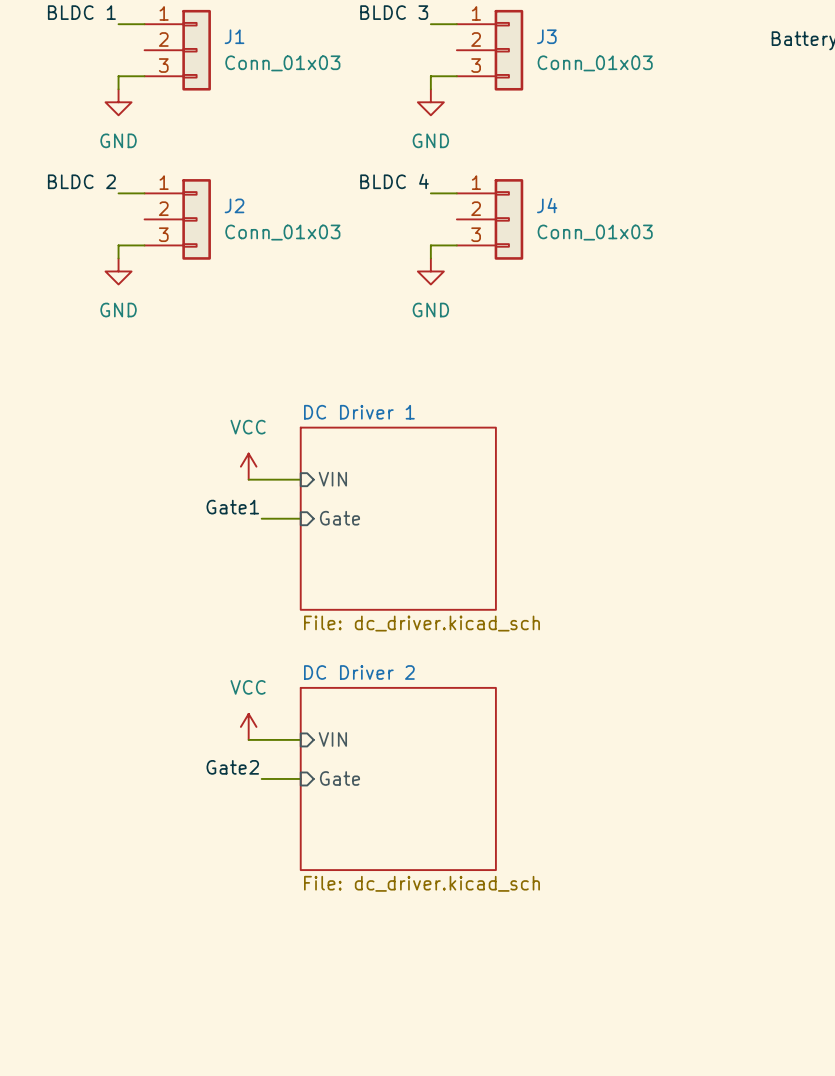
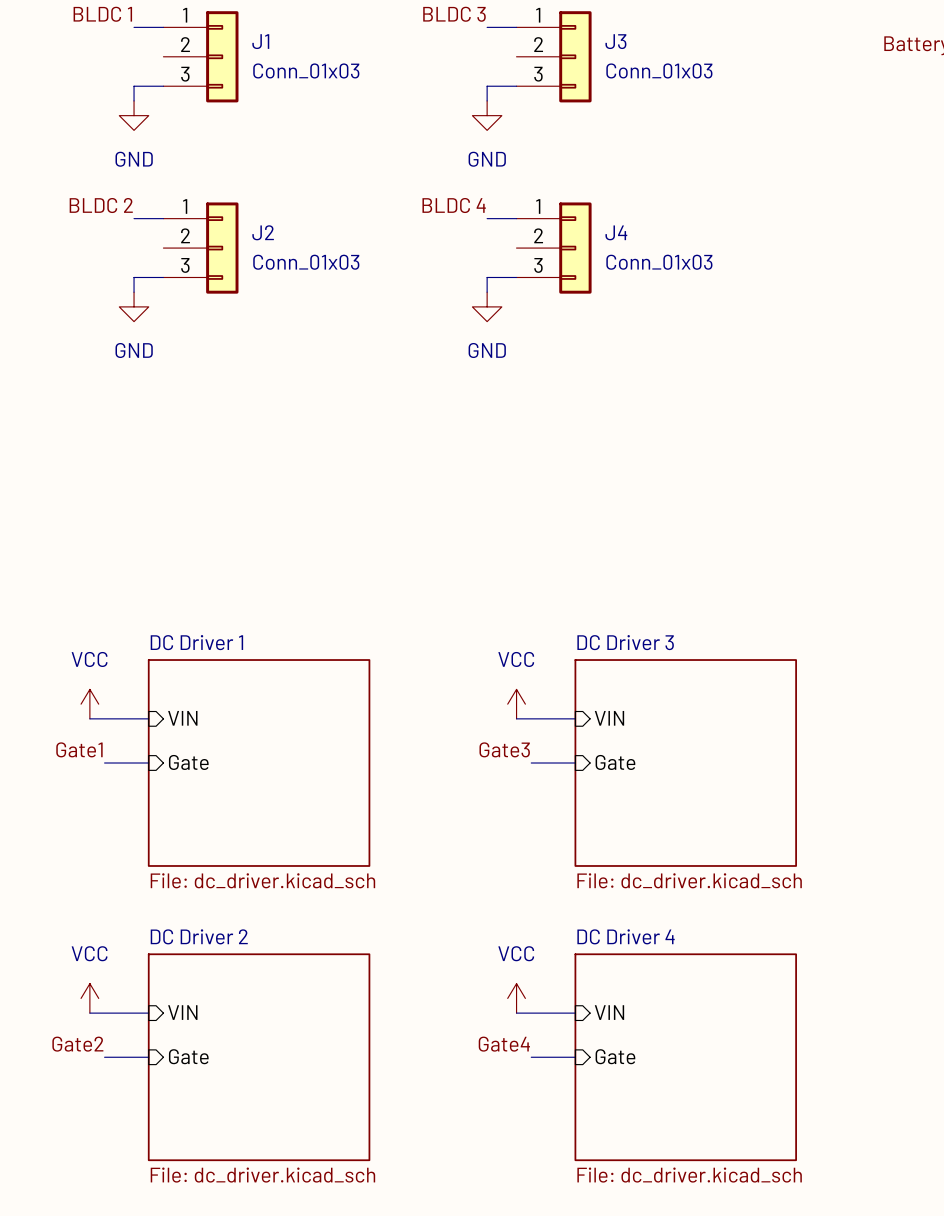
power symbol: VCC (248, 466) -> none
wire: (248, 479) (300, 479) -> (89, 718) (148, 718)
sheet pin: VIN (332, 479) -> none
label position: Gate1 (232, 507) -> Gate1 (79, 749)
wire: (261, 518) (300, 518) -> (104, 763) (148, 763)
sheet pin: Gate (339, 518) -> none
sheet DC Driver 1 position: (398, 518) -> (259, 763)
power symbol: none -> VCC (89, 704)
power symbol: none -> VCC (516, 704)
sheet pin: none -> VIN (182, 718)
wire: none -> (516, 718) (575, 718)
sheet pin: none -> VIN (609, 718)
label: none -> Gate3 (504, 749)
sheet pin: none -> Gate (188, 762)
wire: none -> (531, 763) (575, 763)
sheet pin: none -> Gate (615, 762)
sheet DC Driver 3: none -> File: dc_driver.kicad_sch (685, 763)
power symbol: VCC (248, 726) -> none
wire: (248, 739) (300, 739) -> (89, 1013) (148, 1013)
sheet pin: VIN (332, 739) -> none
label position: Gate2 (232, 767) -> Gate2 (77, 1044)
wire: (261, 778) (300, 778) -> (104, 1057) (148, 1057)
sheet pin: Gate (339, 778) -> none
sheet DC Driver 2 position: (398, 778) -> (259, 1057)
power symbol: none -> VCC (89, 998)
power symbol: none -> VCC (516, 998)
sheet pin: none -> VIN (182, 1012)
sheet pin: none -> VIN (609, 1012)
wire: none -> (516, 1013) (575, 1013)
label: none -> Gate4 (504, 1044)
sheet pin: none -> Gate (188, 1056)
sheet pin: none -> Gate (615, 1056)
wire: none -> (531, 1057) (575, 1057)
sheet DC Driver 4: none -> File: dc_driver.kicad_sch (685, 1057)

